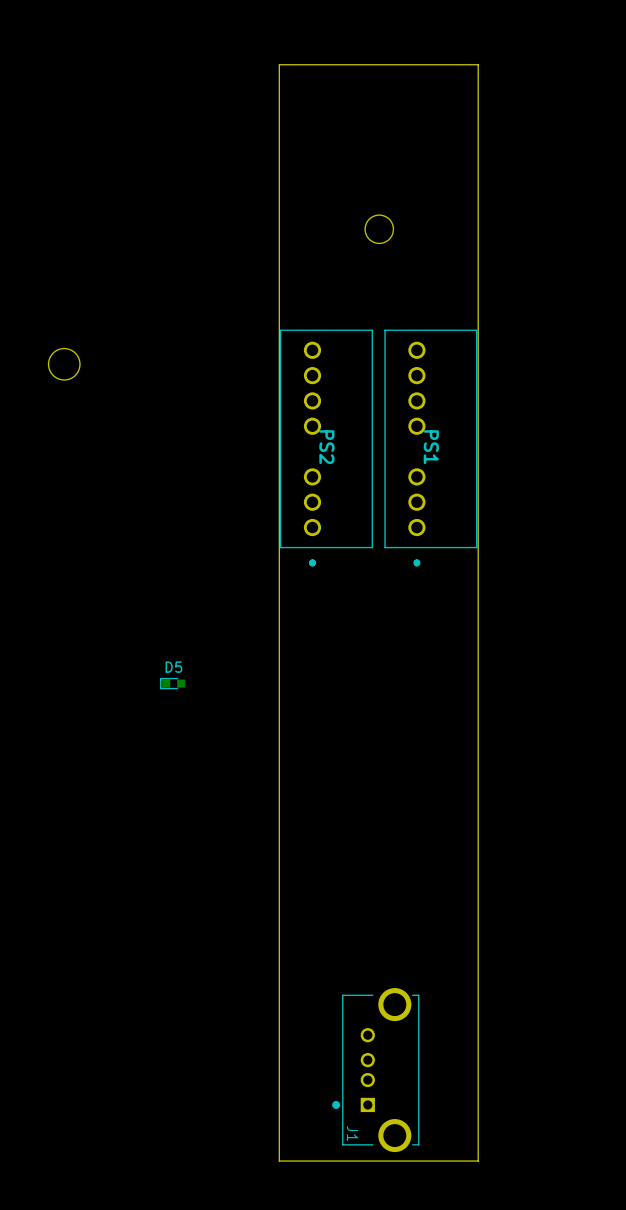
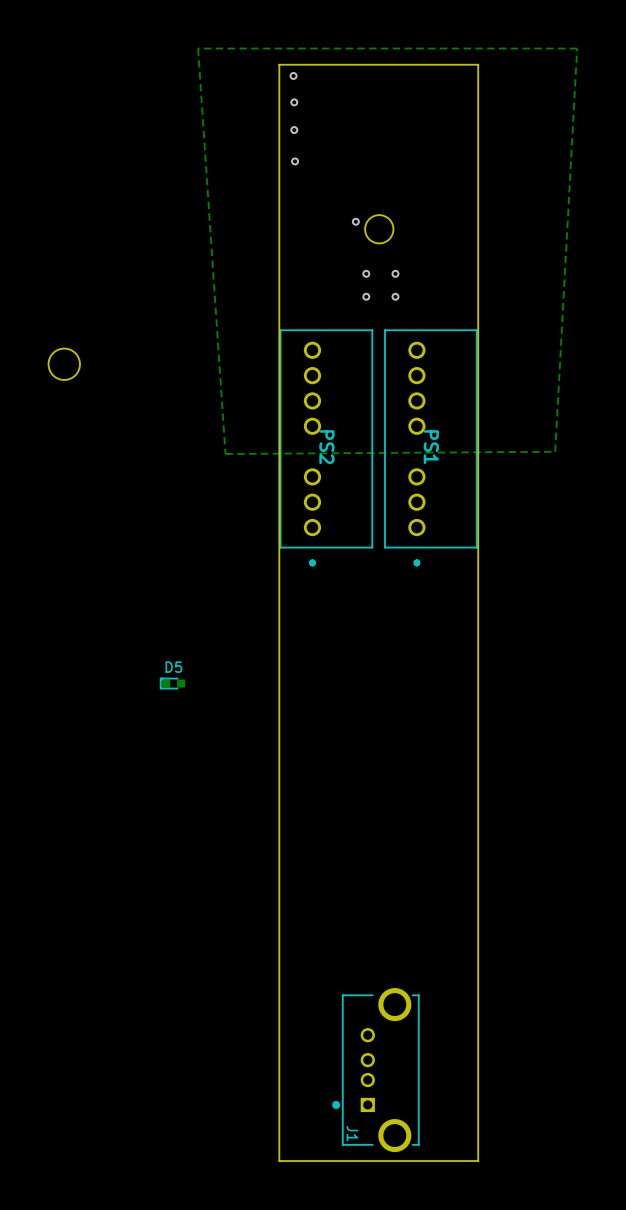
zone outline: none -> (577, 48) (555, 451) (225, 454) (198, 48) (577, 48)
via: none -> (293, 75)
via: none -> (294, 102)
via: none -> (294, 130)
via: none -> (295, 161)
via: none -> (355, 221)
via: none -> (366, 273)
via: none -> (395, 273)
via: none -> (366, 296)
via: none -> (395, 296)

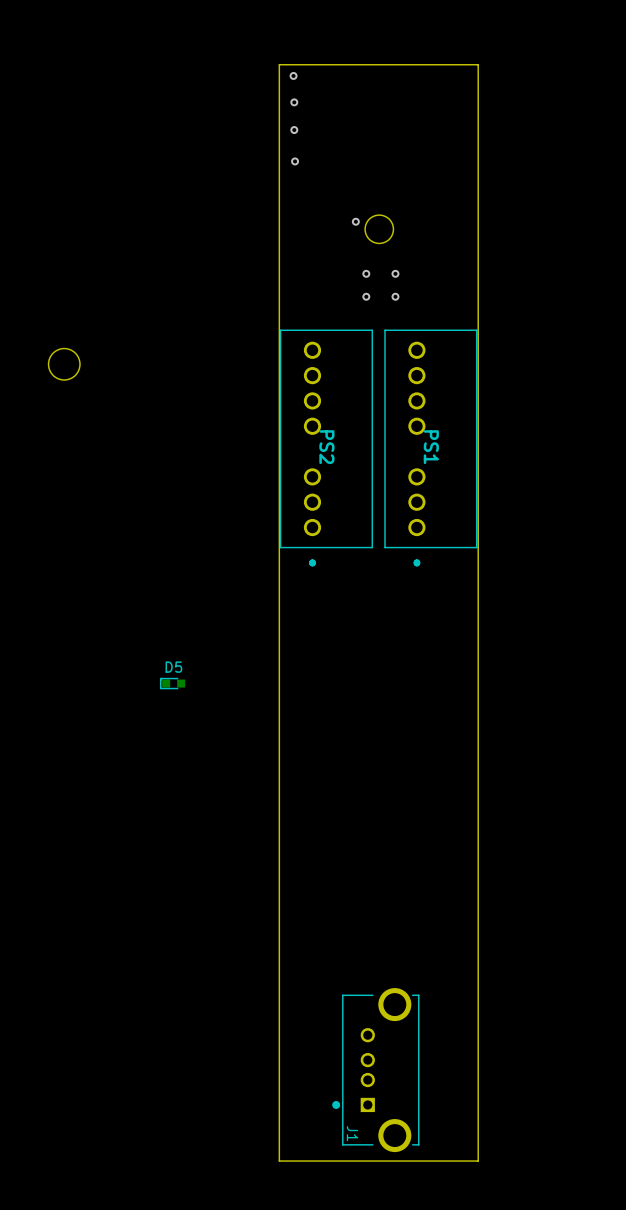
zone outline: (577, 48) (555, 451) (225, 454) (198, 48) (577, 48) -> none

